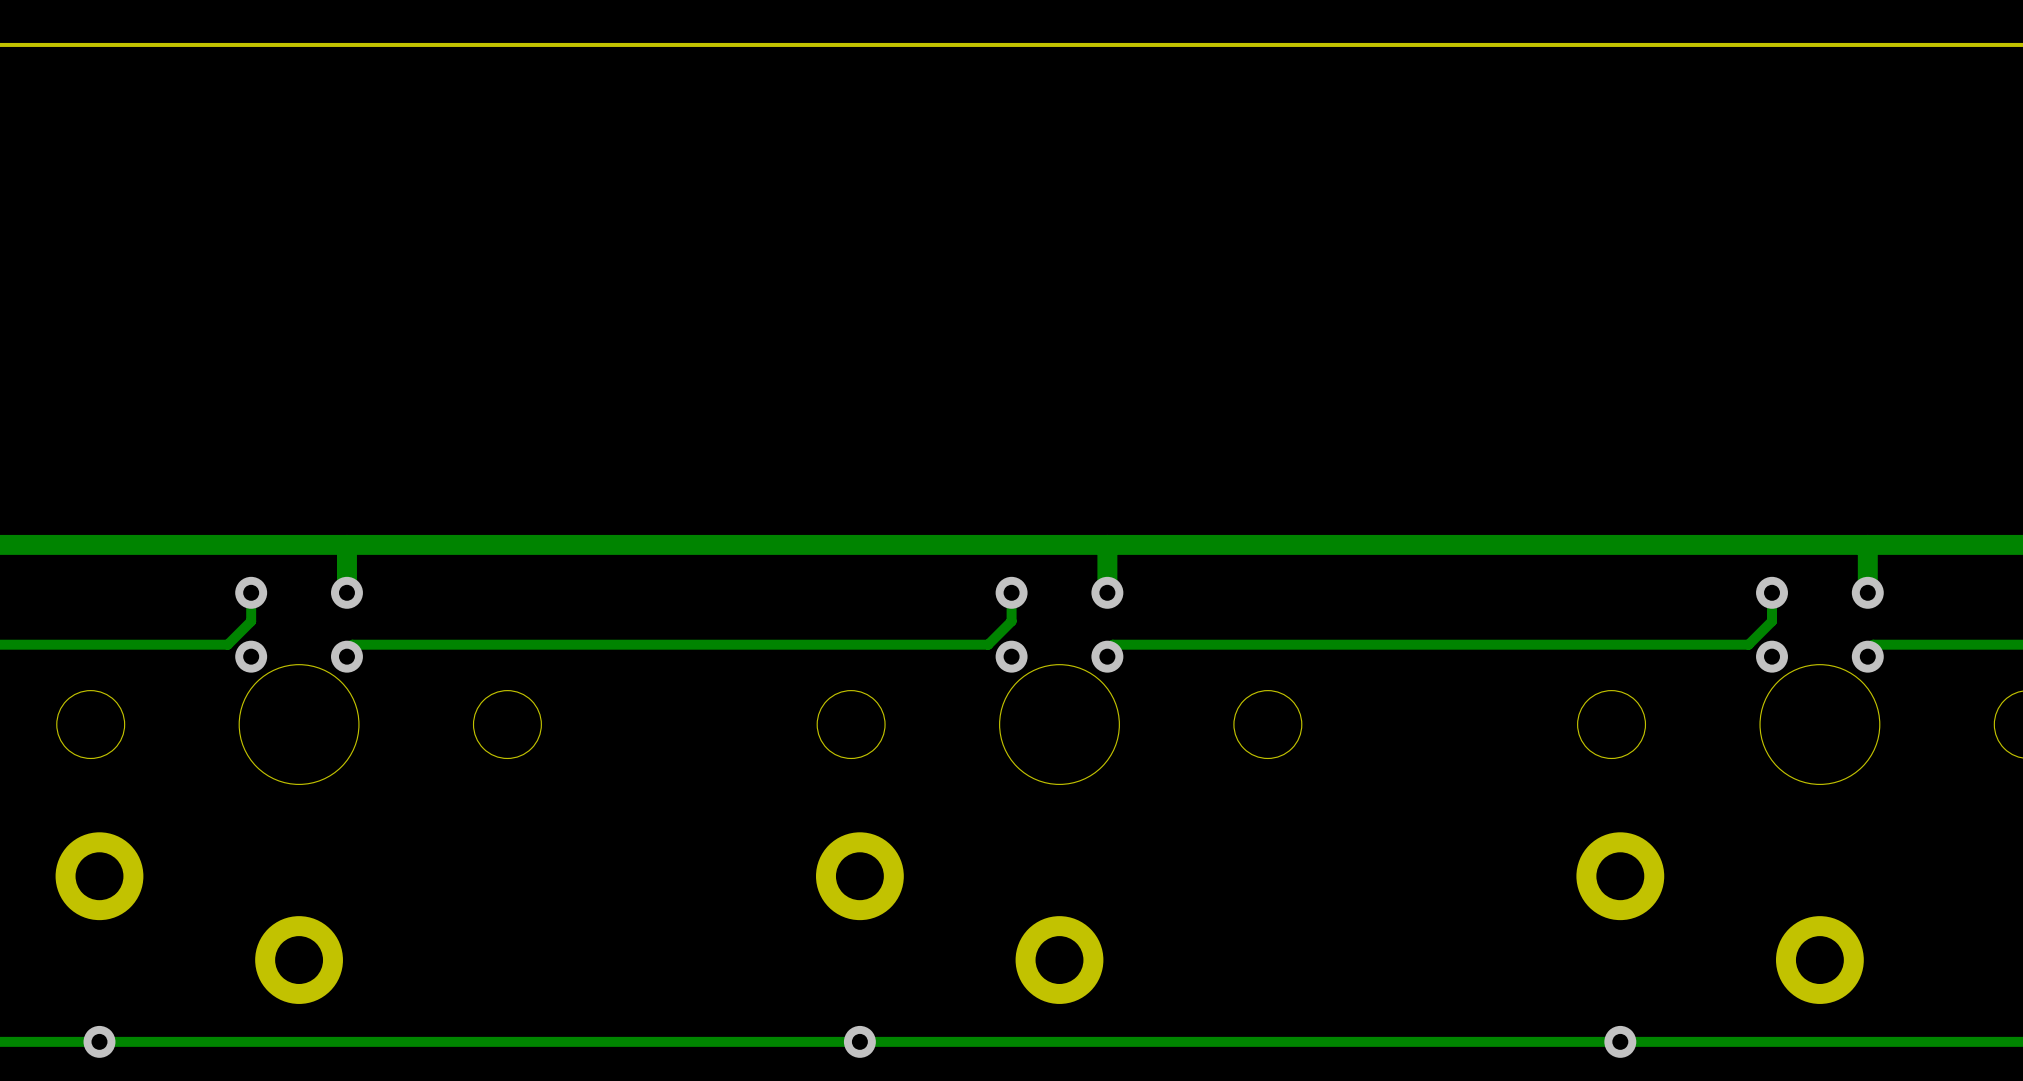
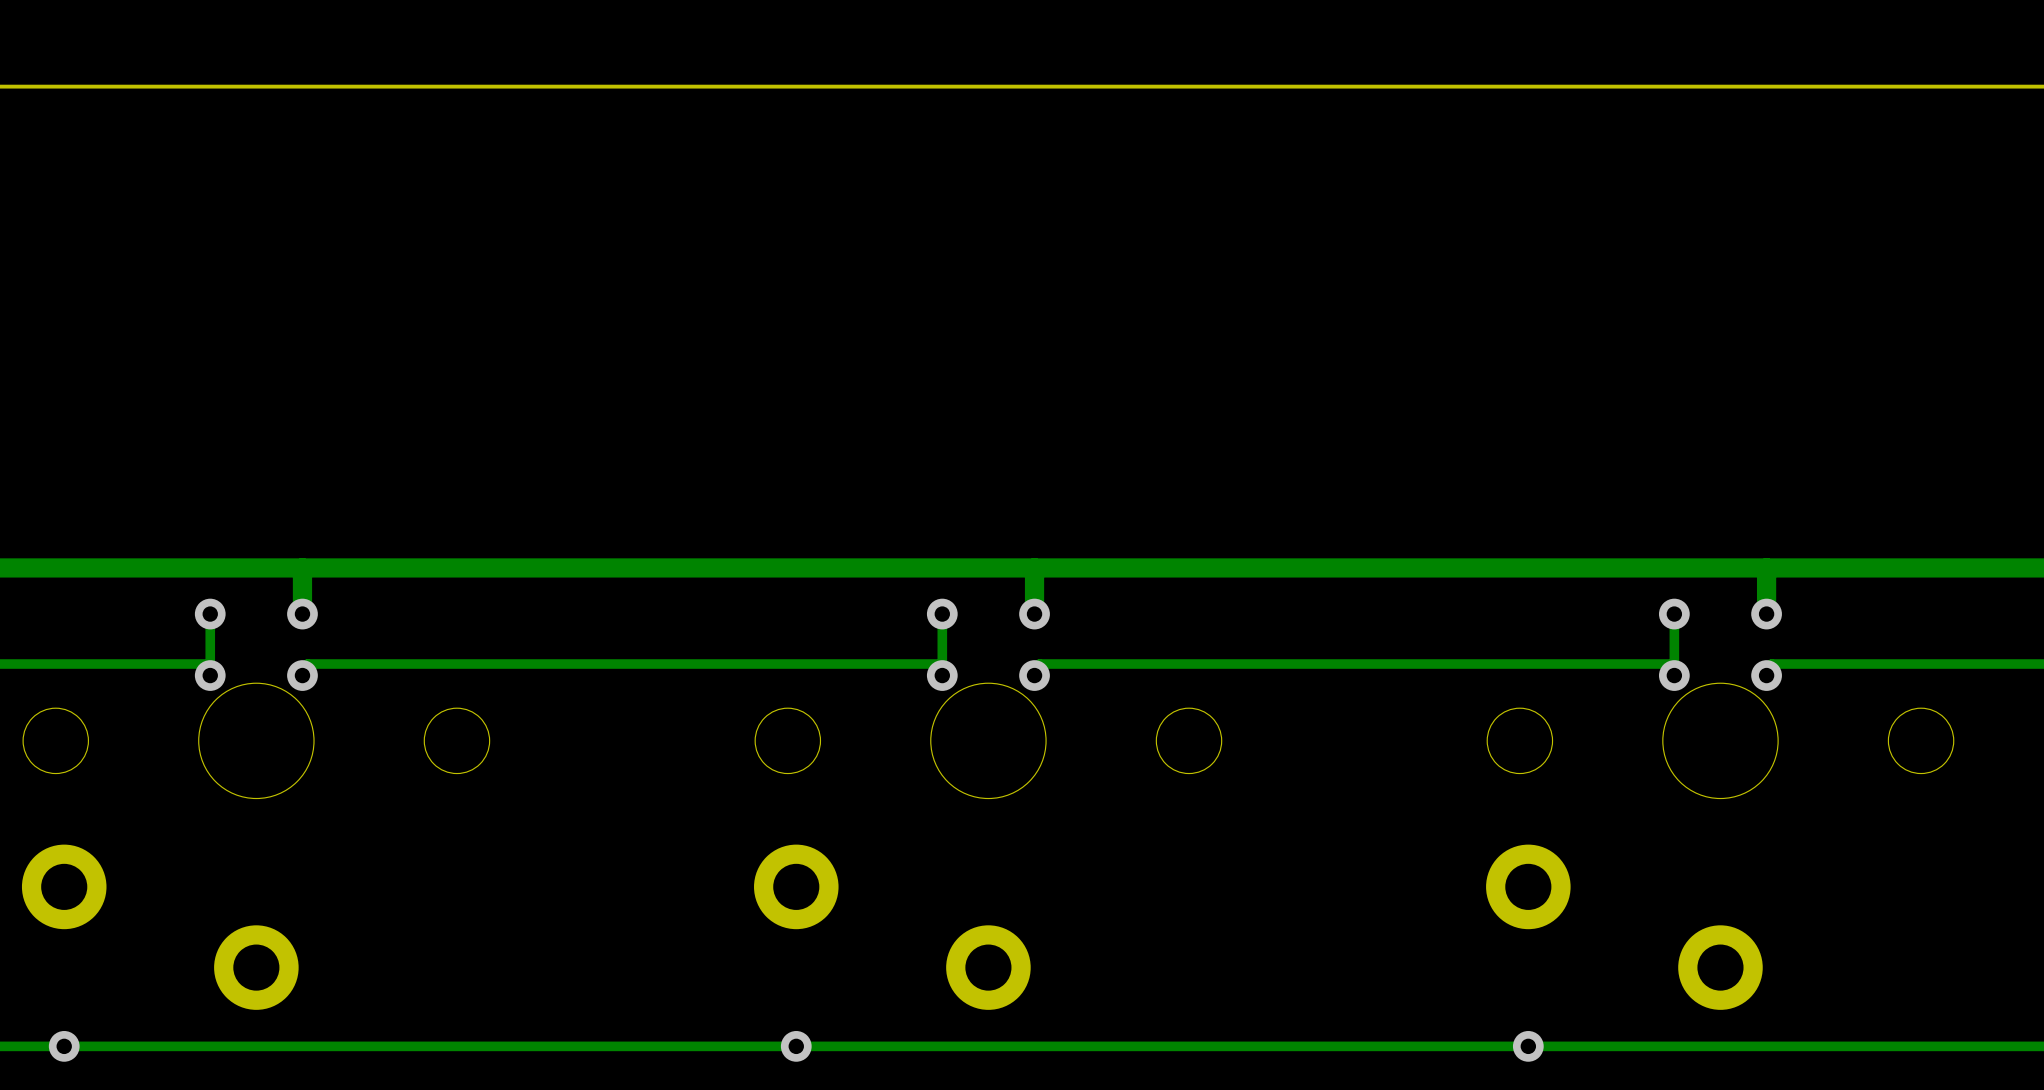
track: (251, 621) (227, 644) -> (210, 641) (210, 664) (187, 664)
track: (1011, 621) (988, 644) -> (942, 641) (942, 664) (919, 664)
track: (1772, 621) (1748, 644) -> (1674, 641) (1674, 664) (1651, 664)

